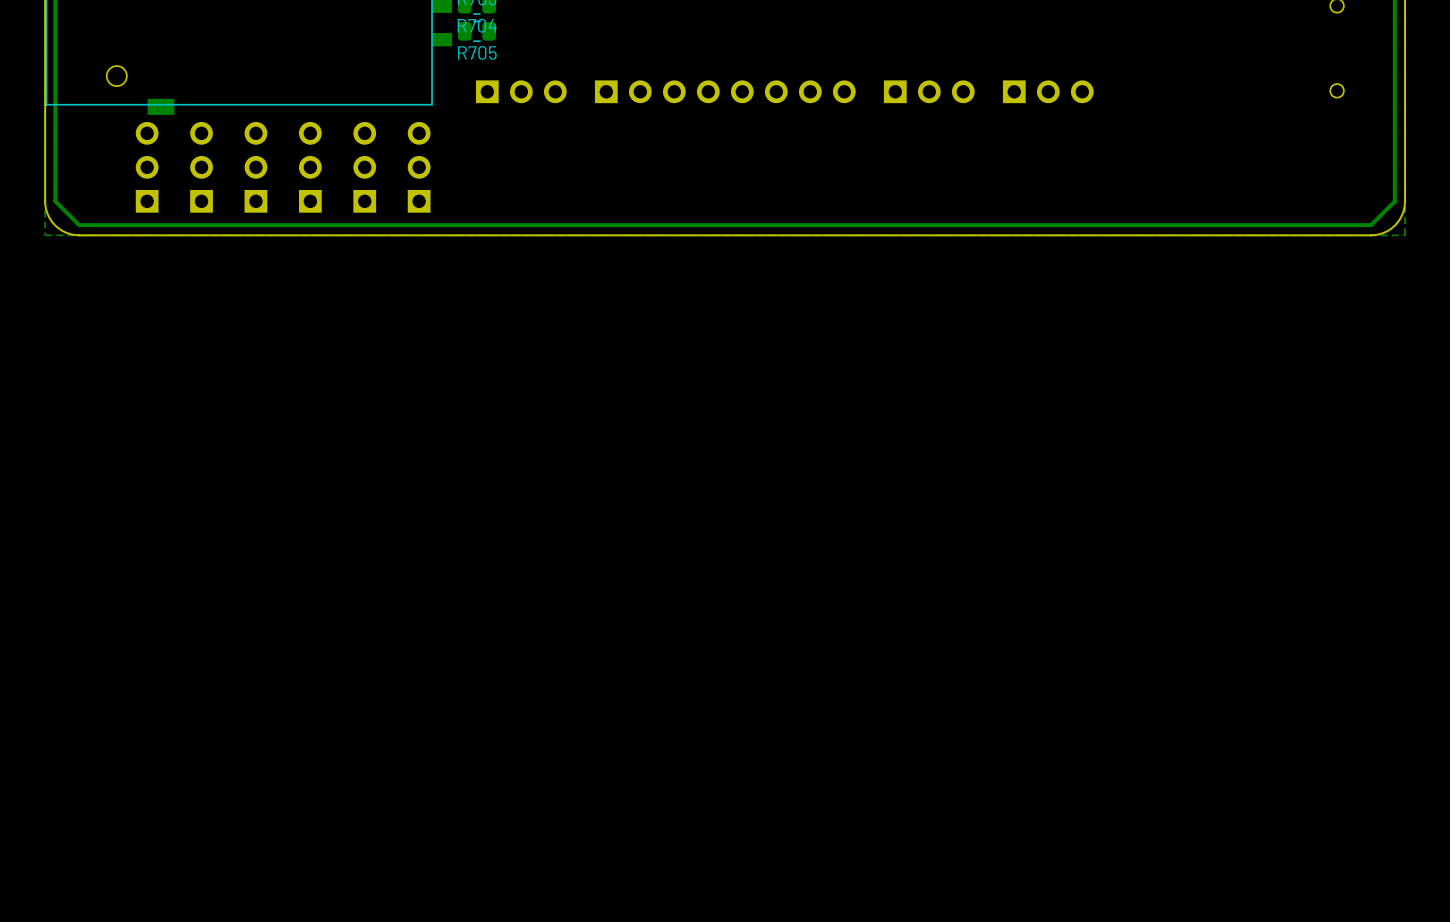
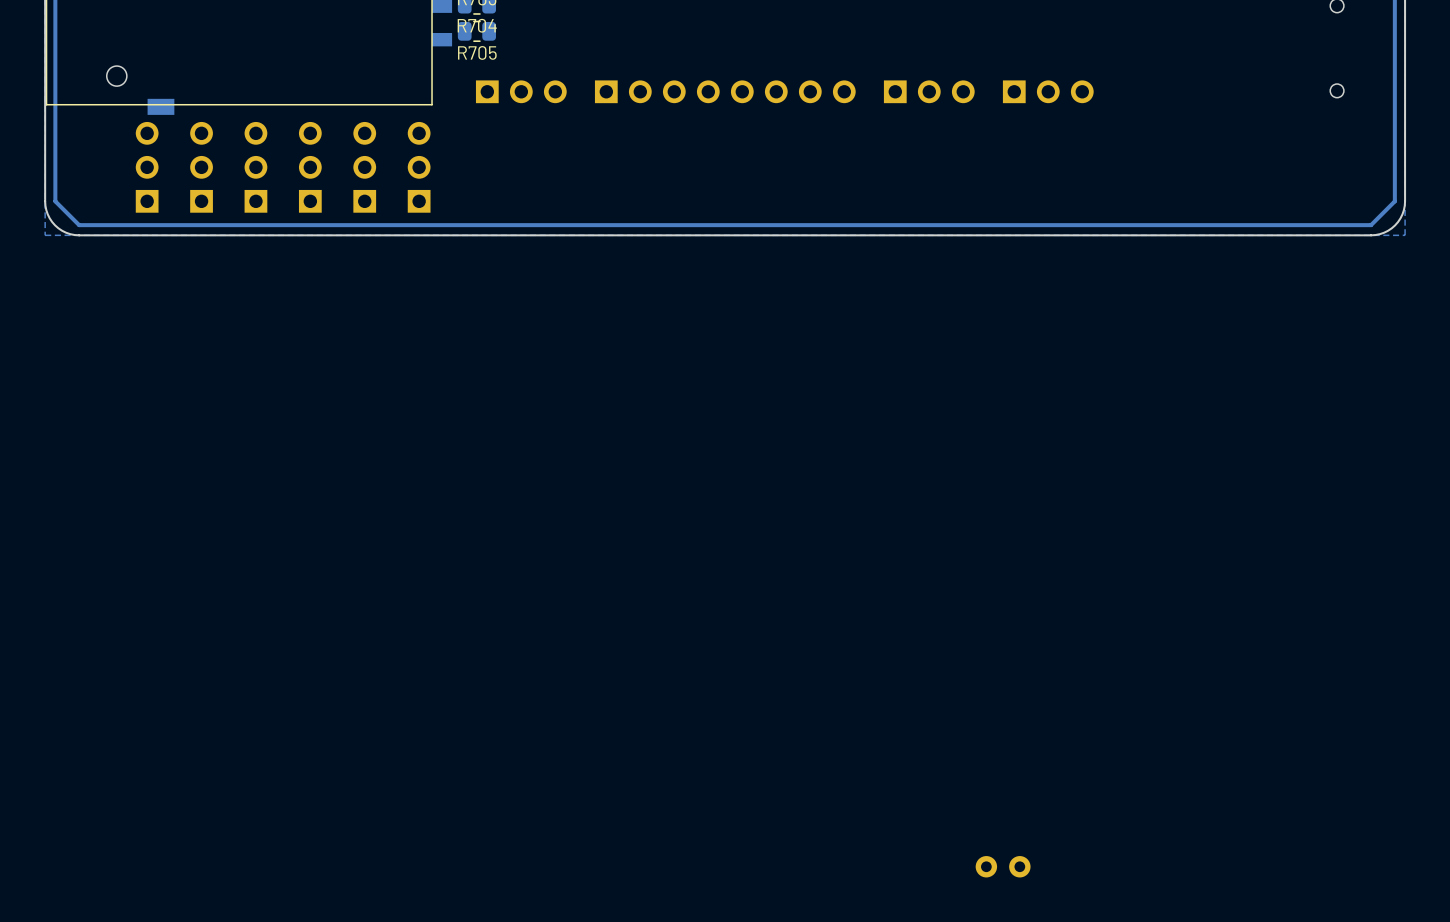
part: none -> (1003, 866)

